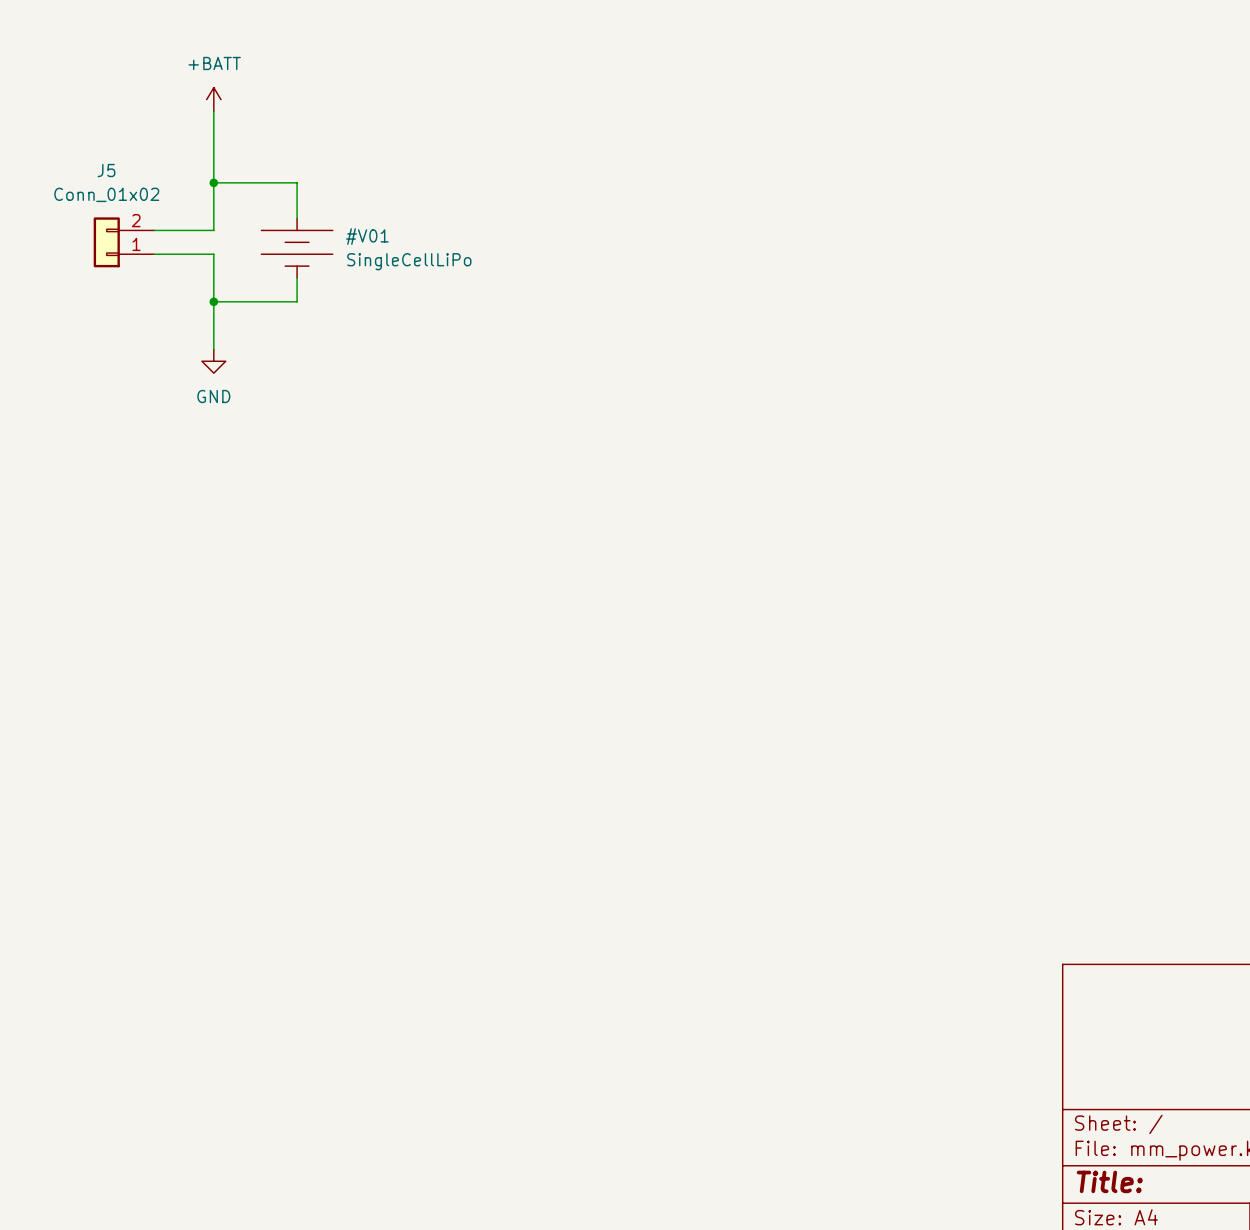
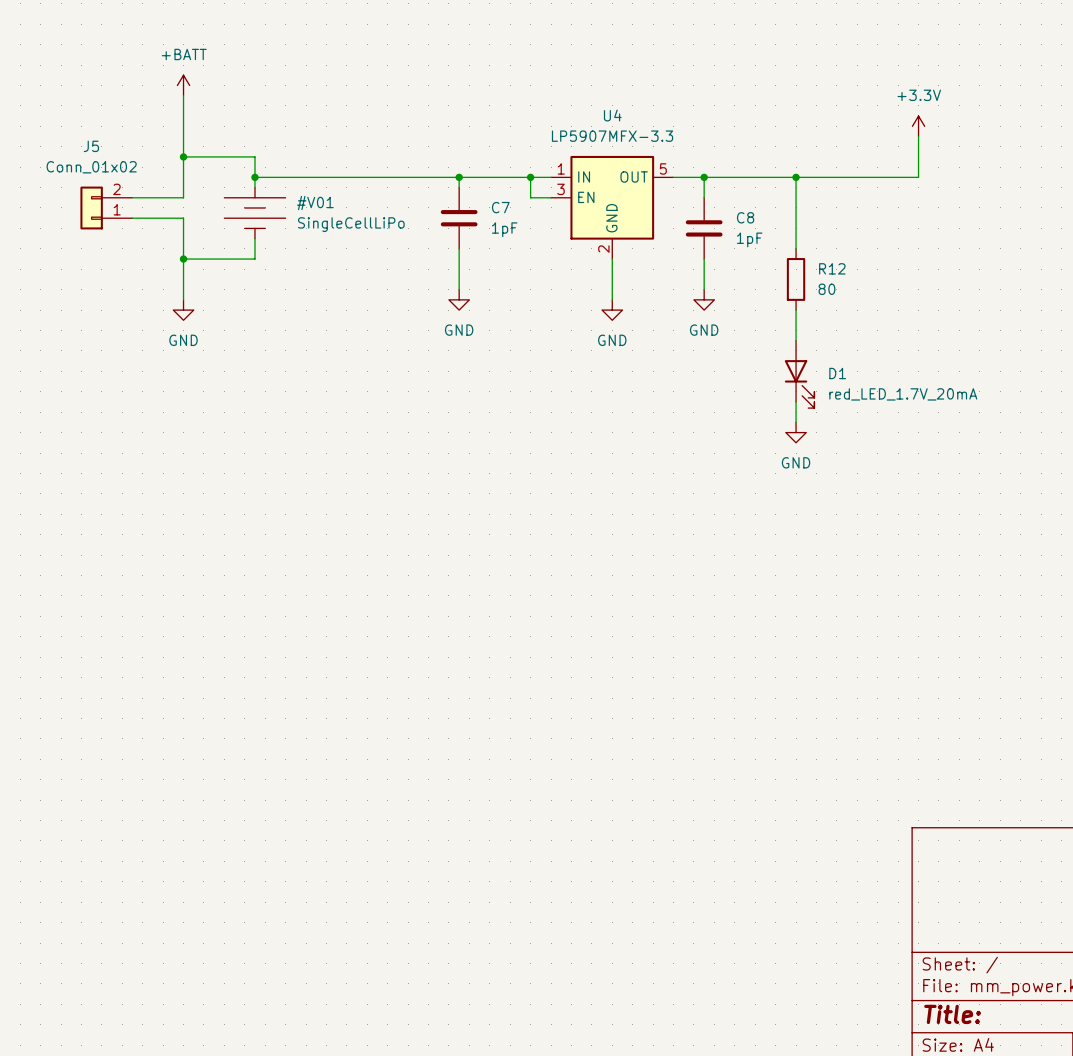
power symbol: none -> +3.3V (918, 126)
wire: none -> (918, 136) (918, 177) (673, 177)
wire: none -> (254, 177) (551, 177)
junction: none -> (254, 177)
wire: none -> (459, 177) (459, 187)
junction: none -> (459, 177)
wire: none -> (530, 177) (530, 197) (551, 197)
junction: none -> (530, 177)
wire: none -> (704, 177) (704, 197)
junction: none -> (704, 177)
wire: none -> (796, 177) (796, 248)
junction: none -> (796, 177)
U4: none -> LP5907MFX-3.3 (612, 207)
C7: none -> 1pF (459, 218)
C8: none -> 1pF (704, 228)
wire: none -> (459, 248) (459, 289)
wire: none -> (612, 259) (612, 299)
wire: none -> (704, 259) (704, 289)
R12: none -> 80 (796, 279)
power symbol: none -> GND (459, 299)
power symbol: none -> GND (704, 299)
power symbol: none -> GND (612, 310)
wire: none -> (796, 310) (796, 340)
D1: none -> red_LED_1.7V_20mA (799, 374)
wire: none -> (796, 401) (796, 422)
power symbol: none -> GND (796, 432)

